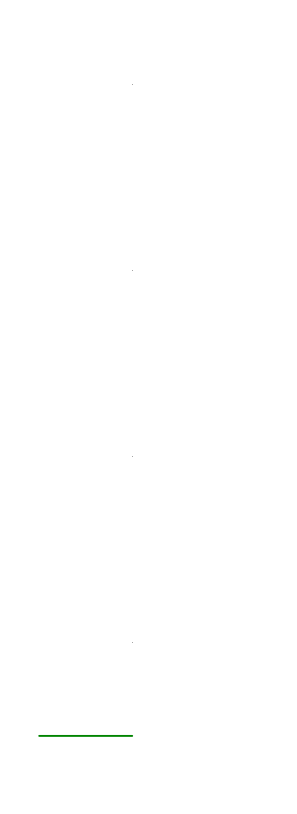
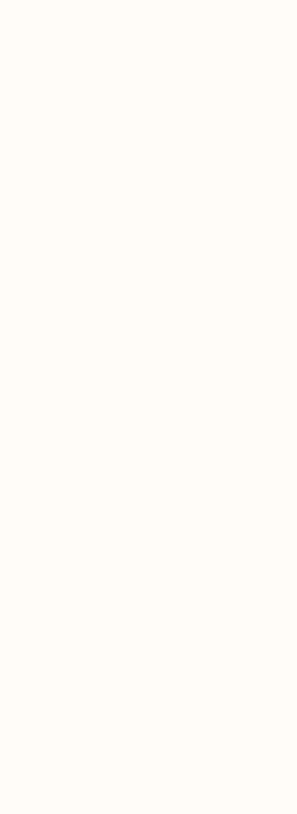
wire: (39, 735) (132, 735) -> none

